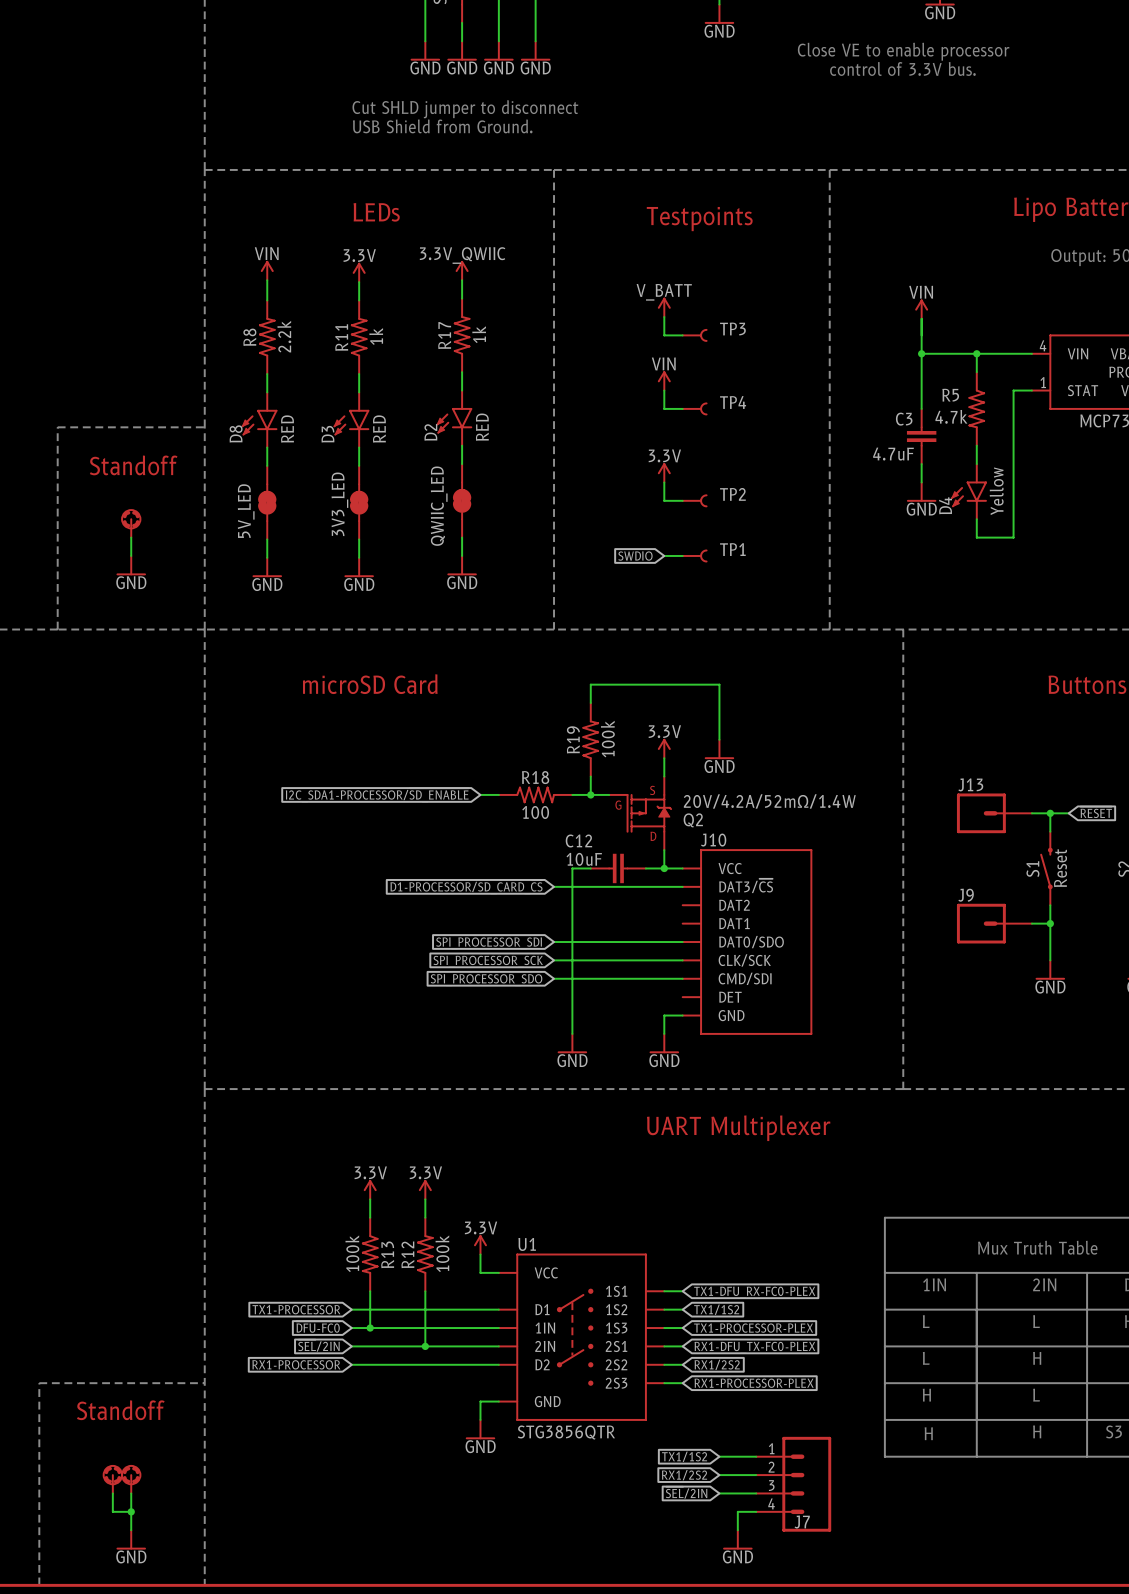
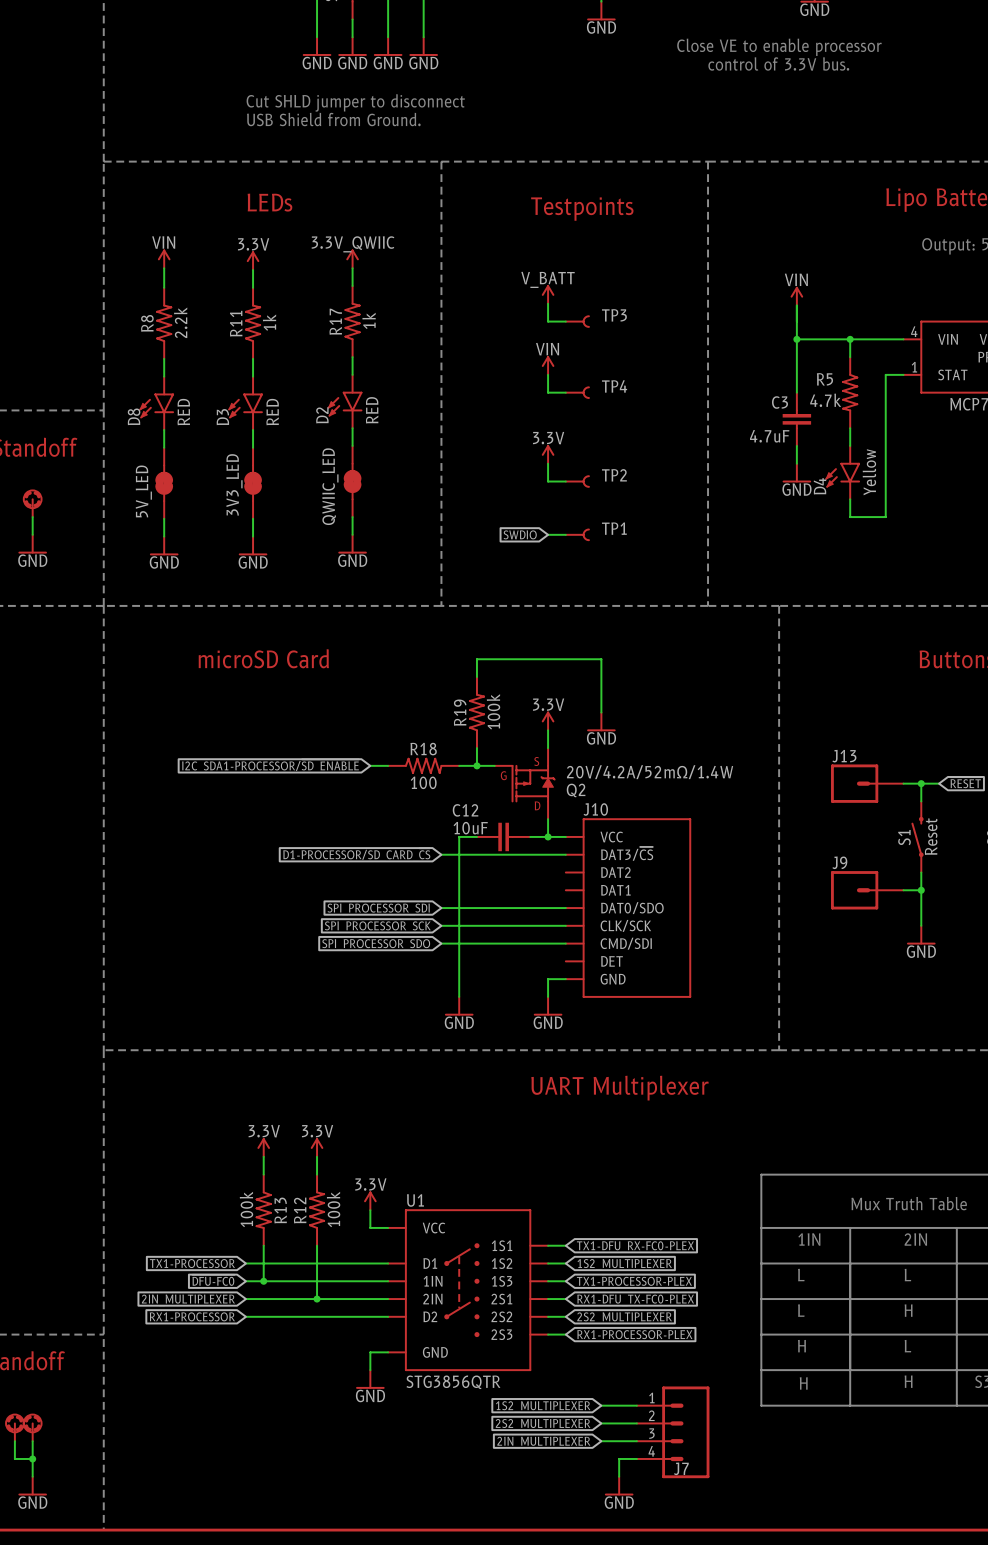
global label: TX1/1S2 (716, 1309) -> 1S2_MULTIPLEXER (624, 1264)
global label: ~{SEL}/2IN (318, 1345) -> 2IN_MULTIPLEXER (188, 1300)
global label: RX1/2S2 (717, 1364) -> 2S2_MULTIPLEXER (624, 1318)
global label: TX1/1S2 (684, 1456) -> 1S2_MULTIPLEXER (543, 1407)
global label: RX1/2S2 (684, 1475) -> 2S2_MULTIPLEXER (543, 1424)
global label: ~{SEL}/2IN (686, 1492) -> 2IN_MULTIPLEXER (543, 1442)

